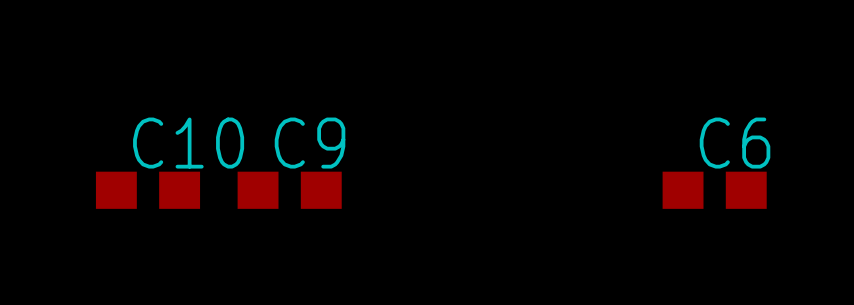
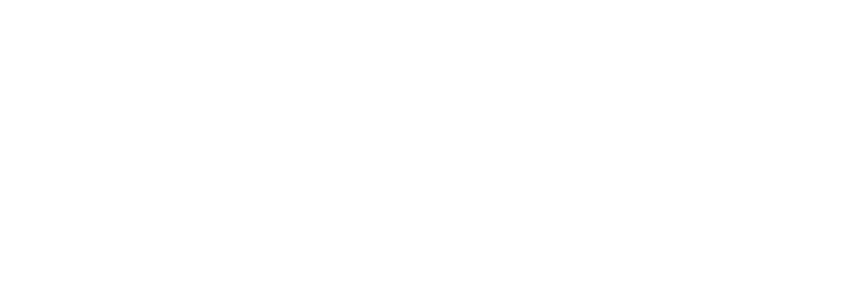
C10: (147, 190) -> none
C9: (289, 190) -> none
C6: (714, 190) -> none

